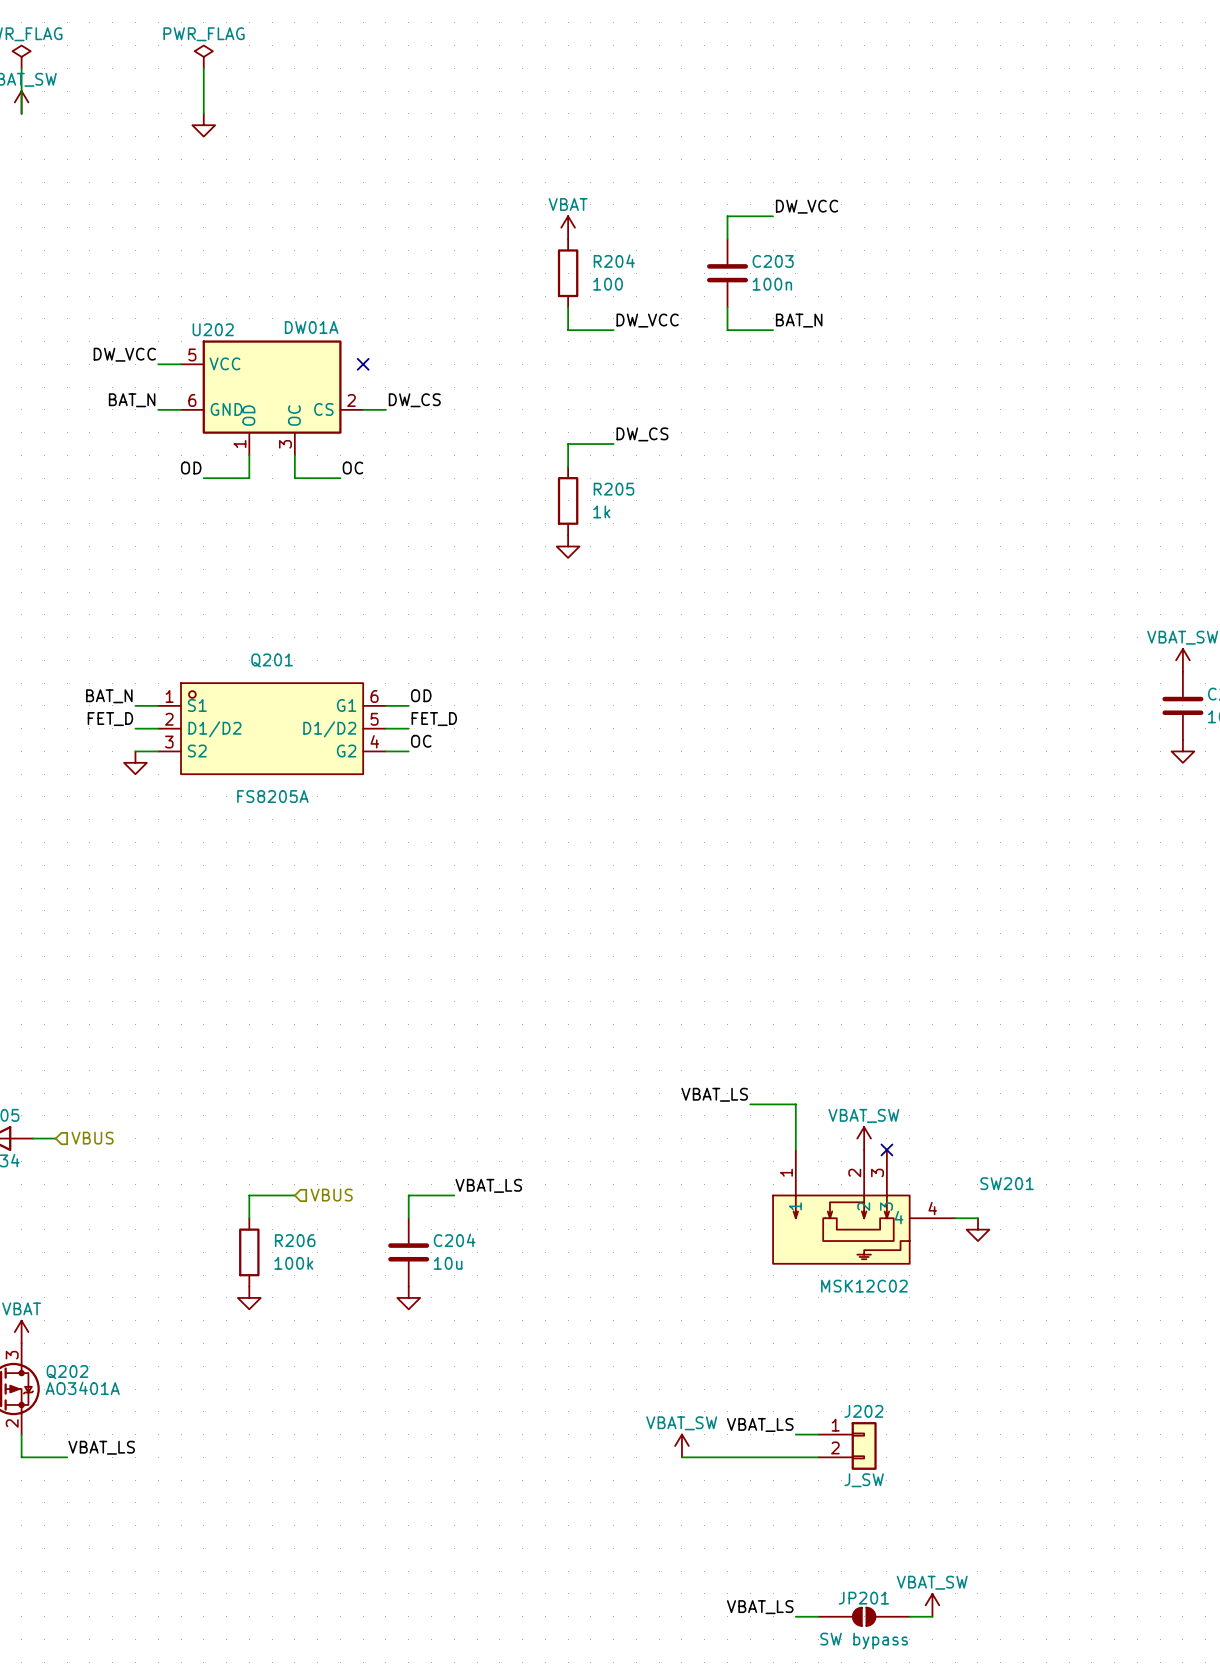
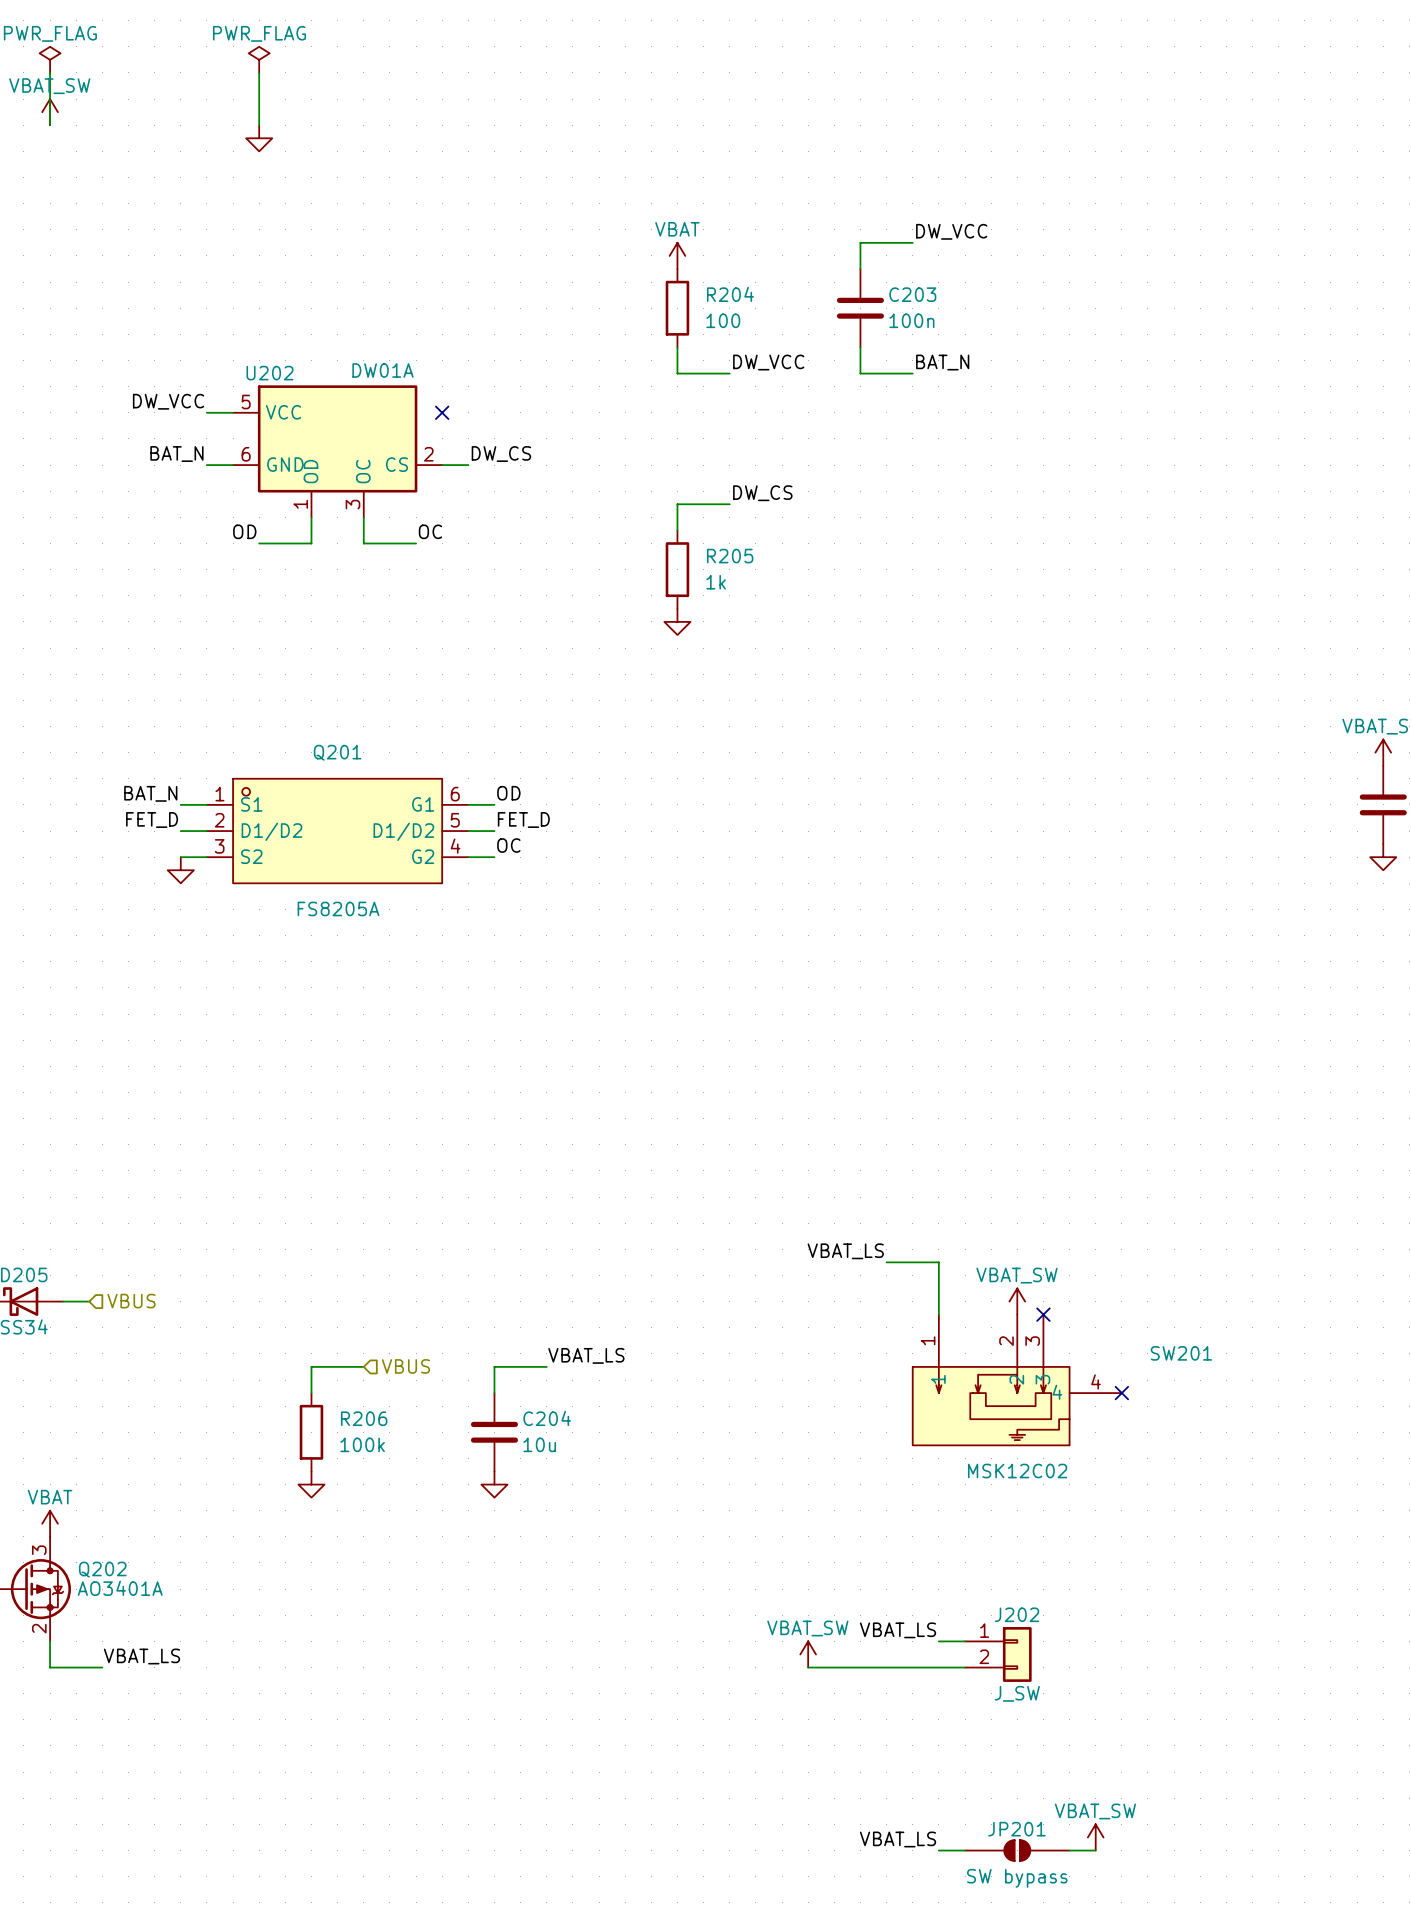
wire: (955, 1218) (977, 1218) -> none
no-connect mark: none -> (1121, 1393)
power symbol: (977, 1229) -> none

